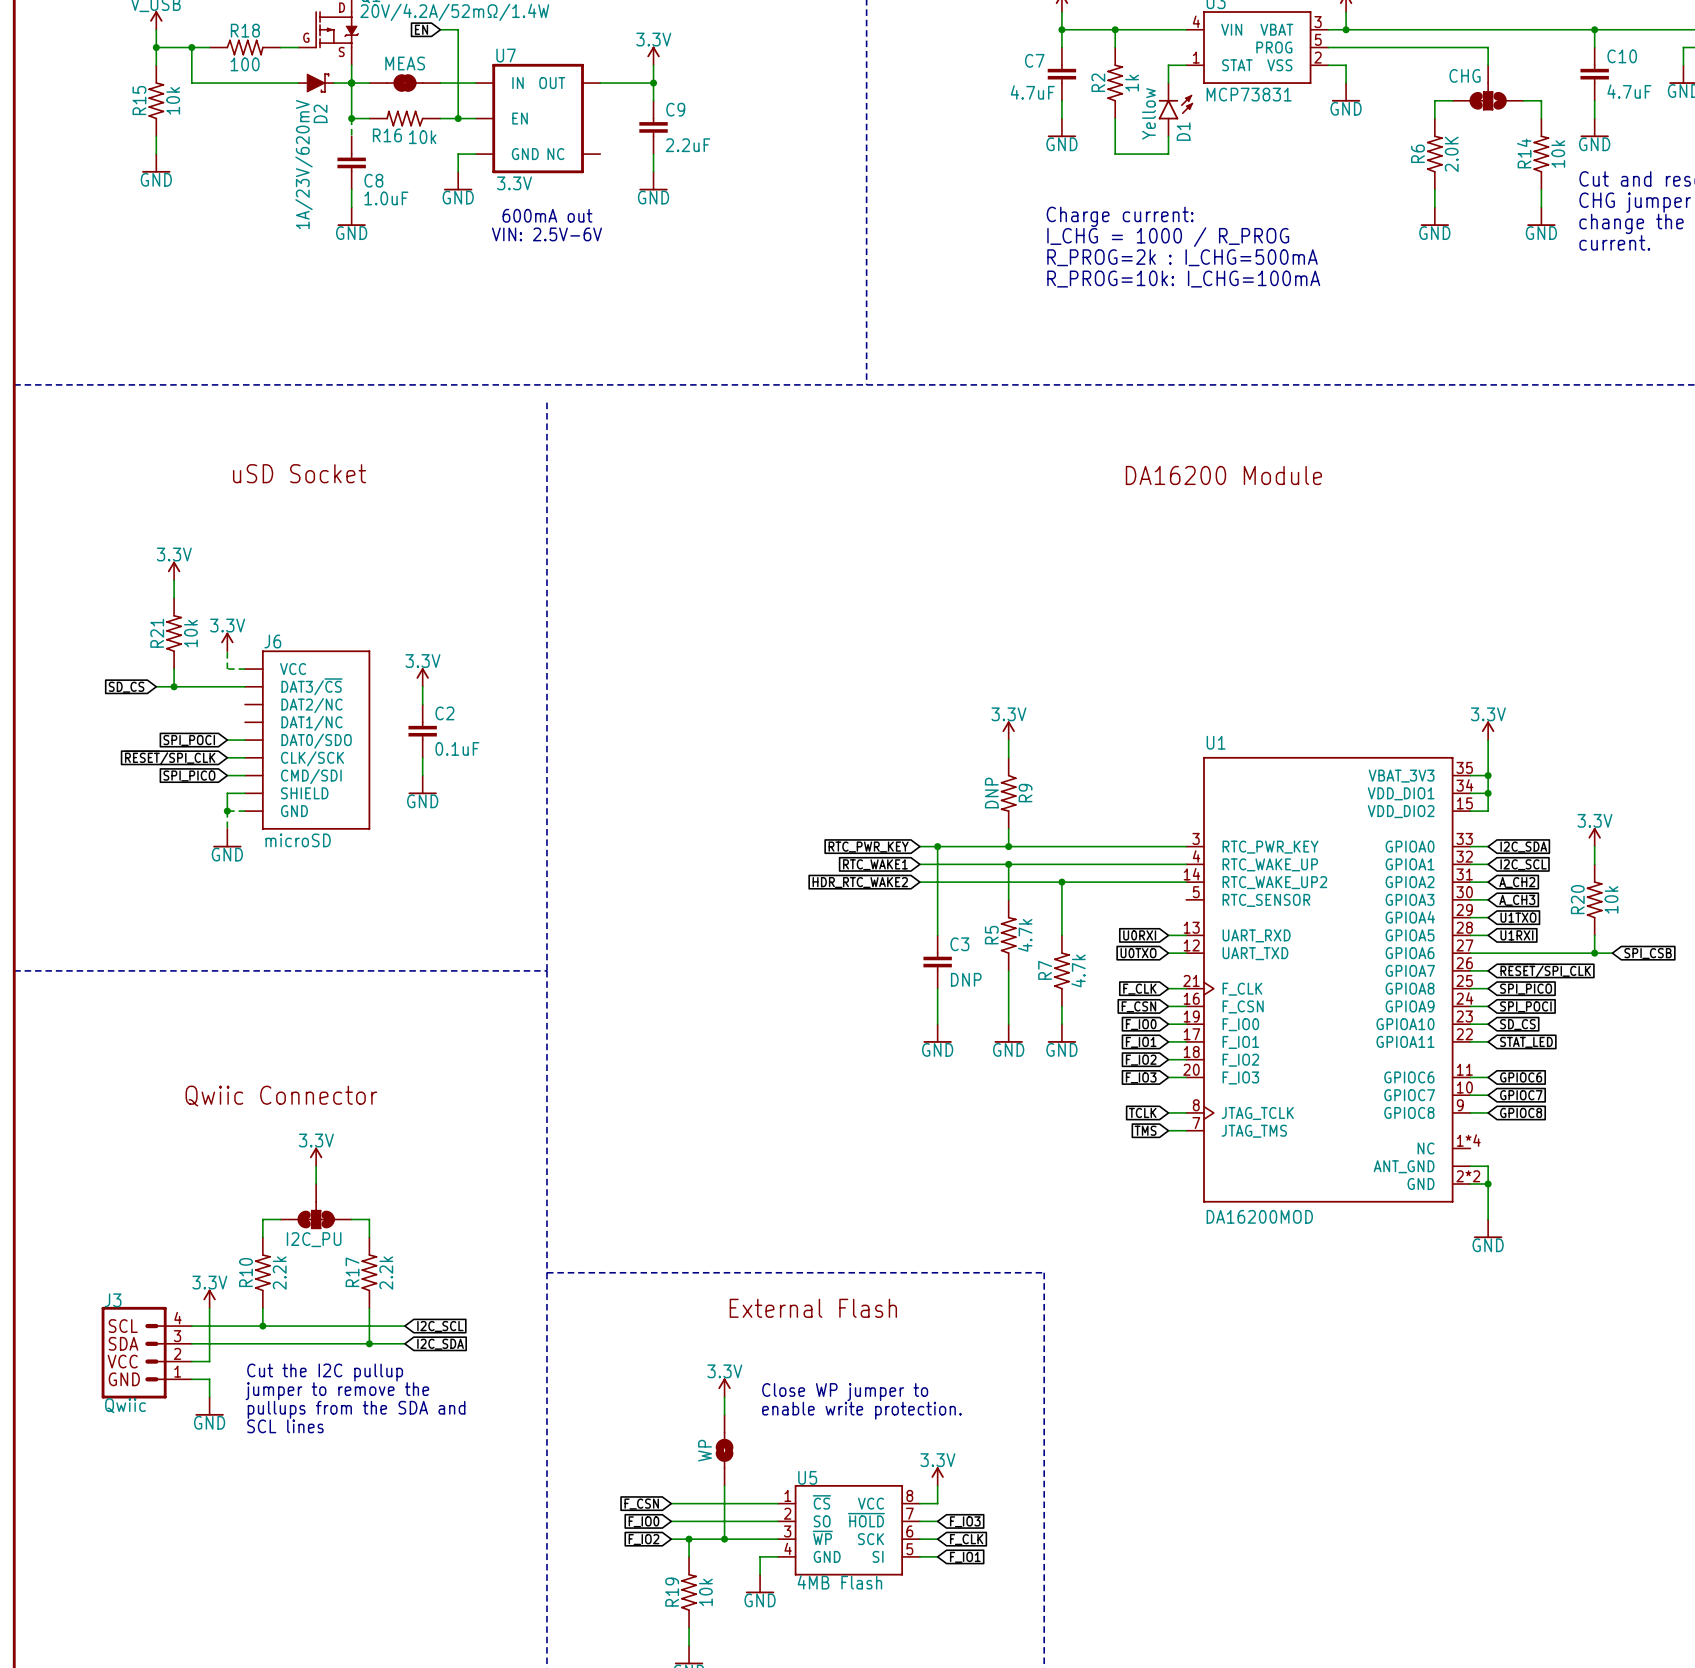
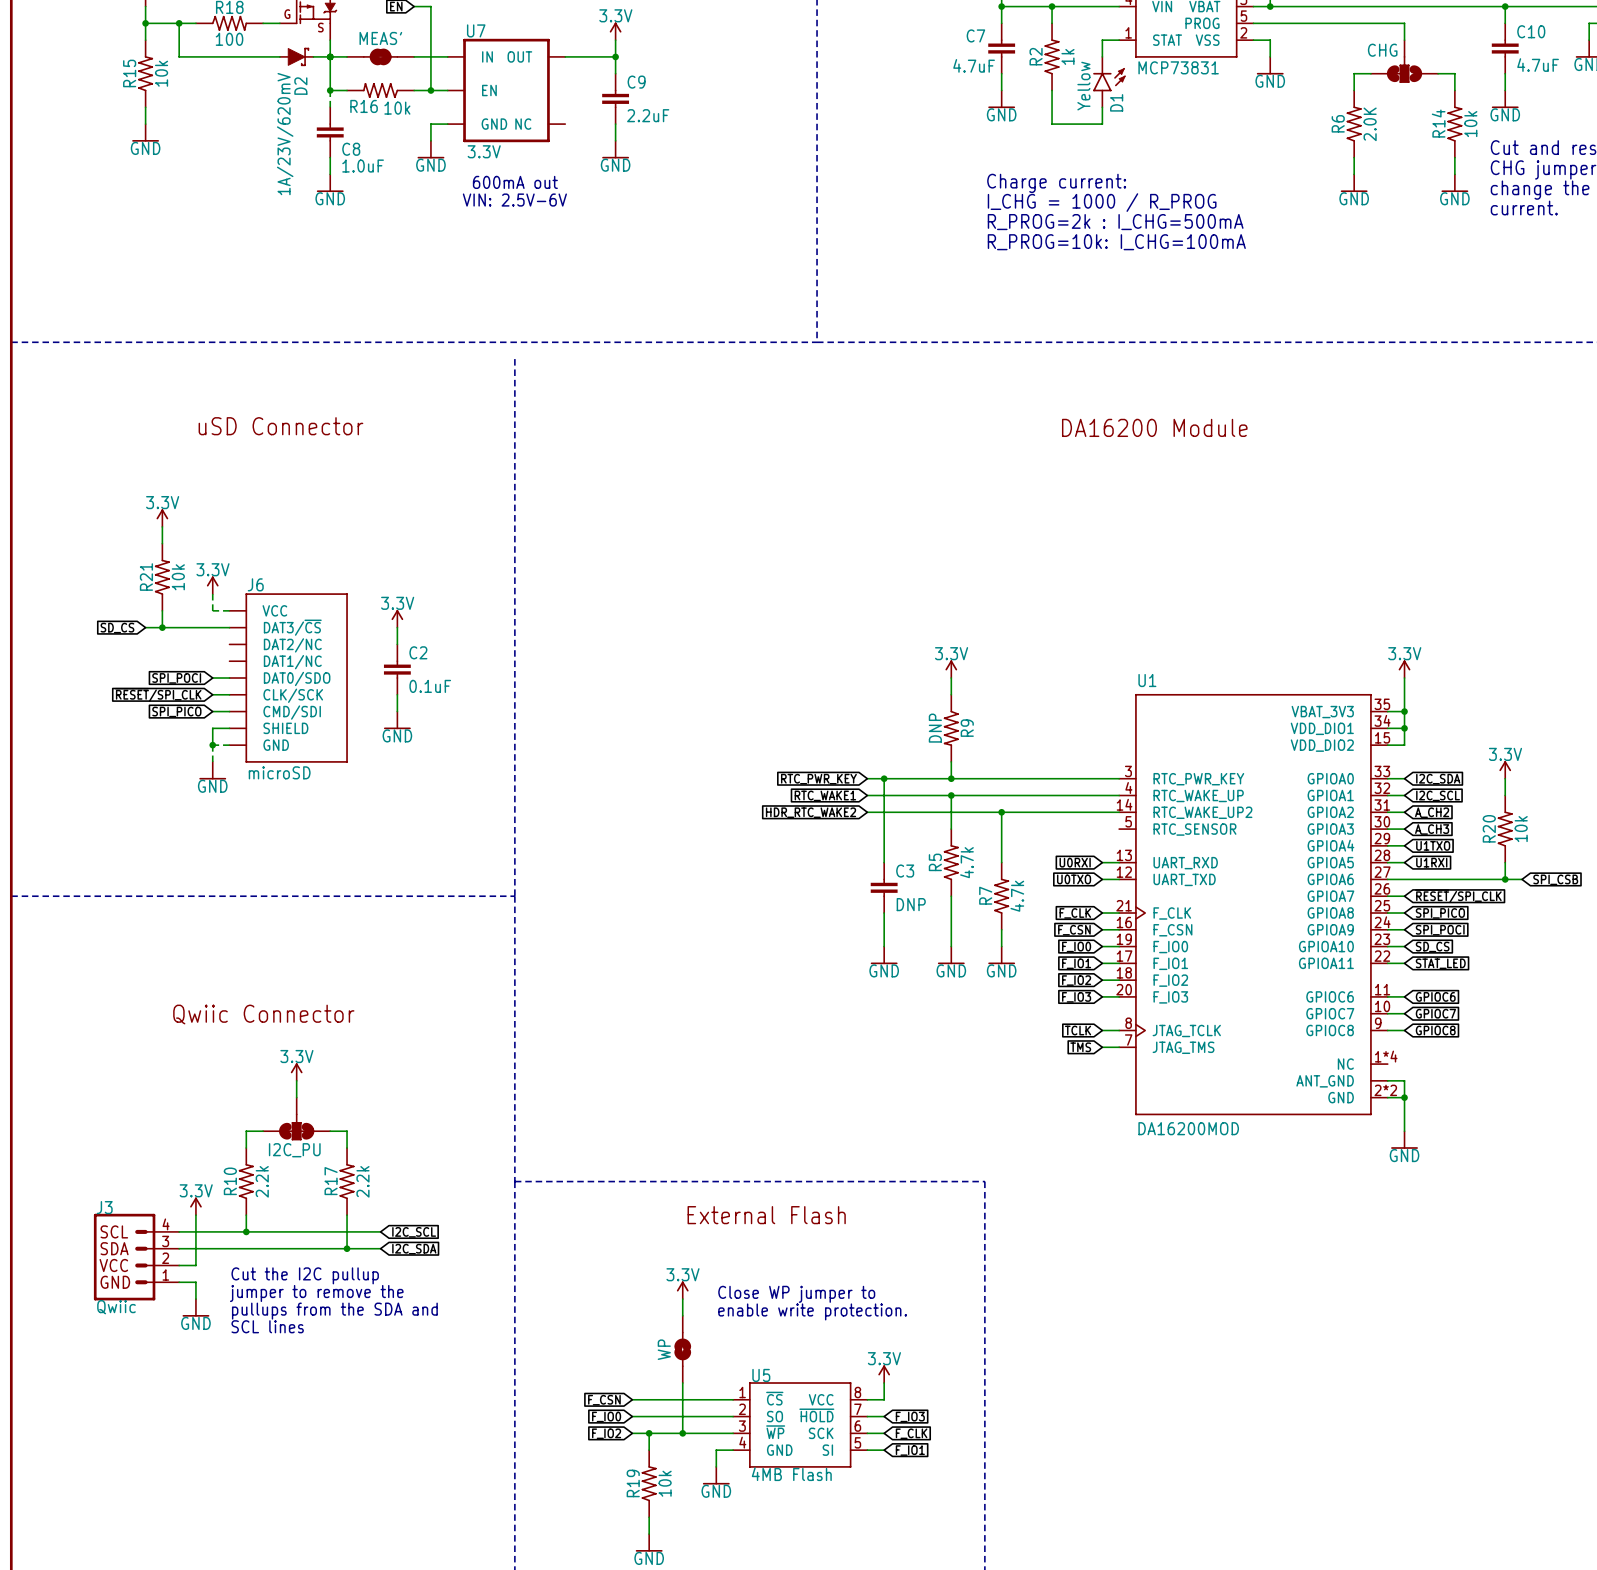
MEAS name: MEAS (405, 63) -> MEAS' (380, 38)
text: uSD Socket (299, 473) -> uSD Connector (280, 426)

